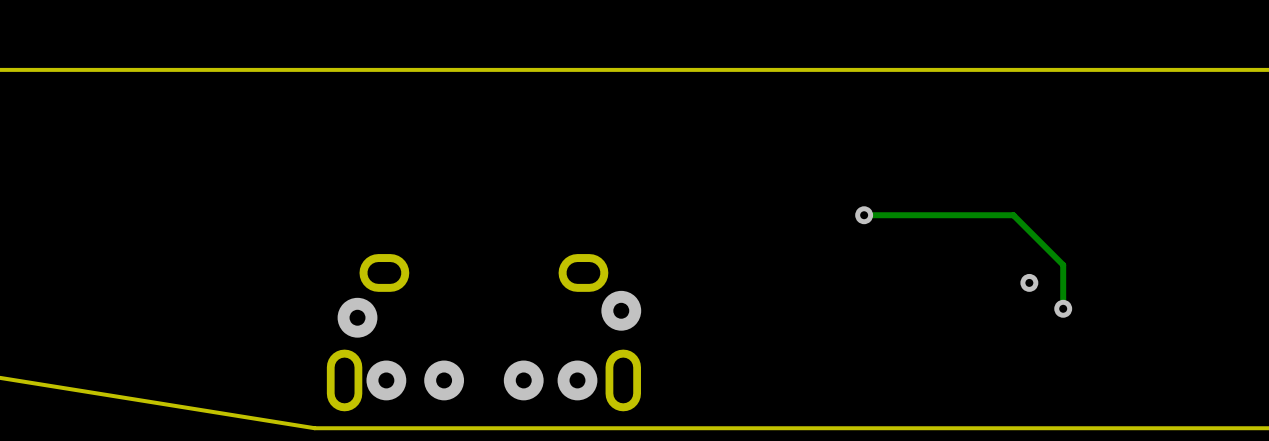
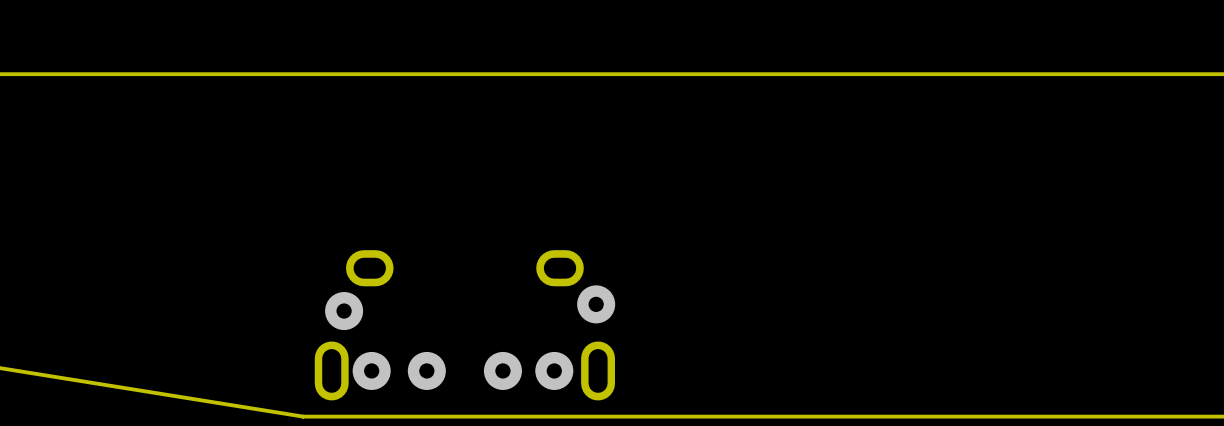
track: (864, 215) (1013, 215) (1063, 264) (1063, 308) -> none
via: (864, 215) -> none
via: (1029, 282) -> none
via: (1063, 308) -> none

